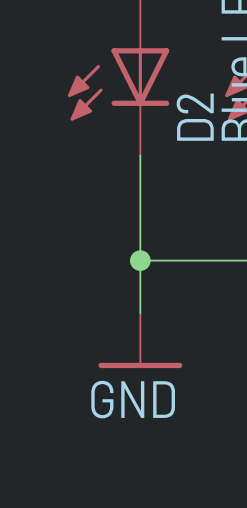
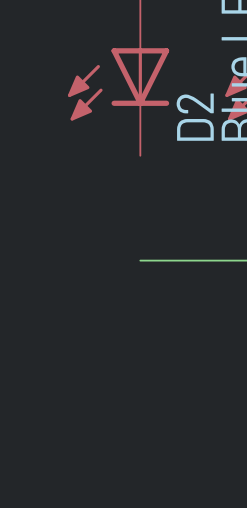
wire: (140, 155) (140, 313) -> none
junction: (140, 260) -> none
power symbol: GND (140, 340) -> none

